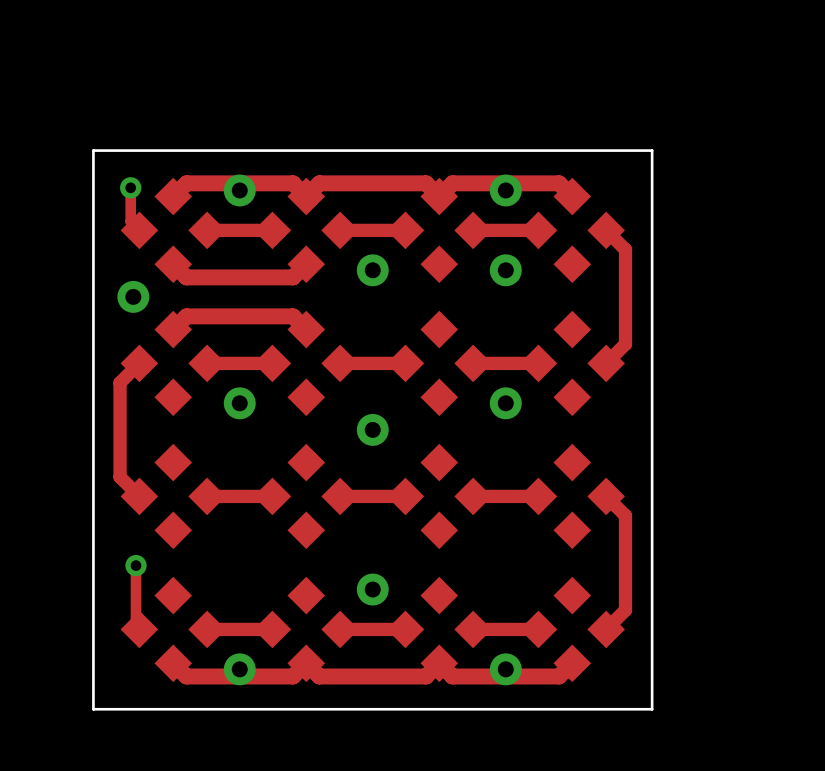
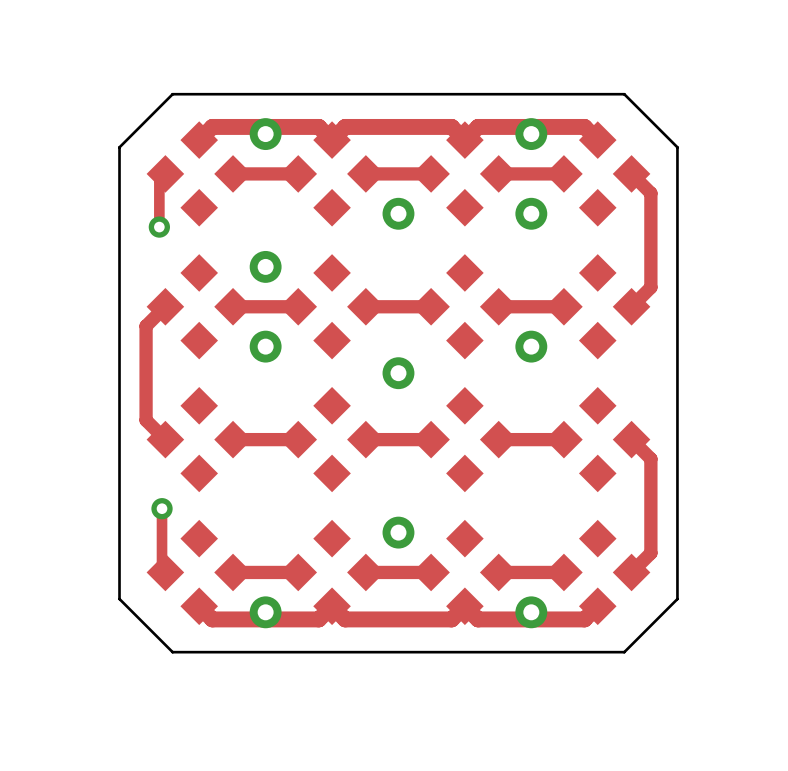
board edge: (146, 150) (93, 150) (93, 203) -> (172, 94) (119, 147)
board edge: (598, 150) (652, 150) (652, 203) -> (624, 94) (677, 147)
track: (130, 187) (130, 221) (139, 230) -> (159, 227) (159, 179) (165, 173)
via position: (130, 187) -> (159, 227)
track: (173, 264) (186, 277) (293, 277) (306, 264) -> none
via position: (133, 296) -> (265, 266)
track: (173, 329) (186, 316) (293, 316) (306, 329) -> none
board edge: (93, 656) (93, 709) (146, 709) -> (119, 599) (172, 652)
board edge: (652, 656) (652, 709) (598, 709) -> (677, 599) (624, 652)

